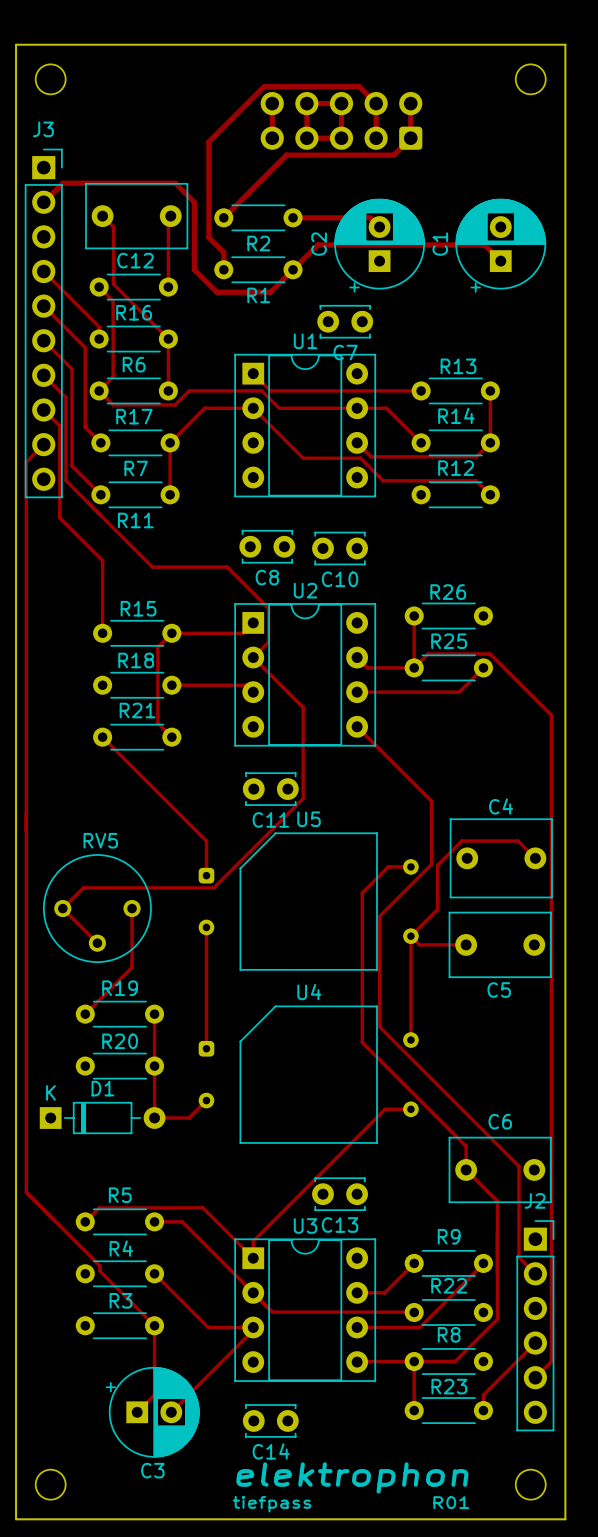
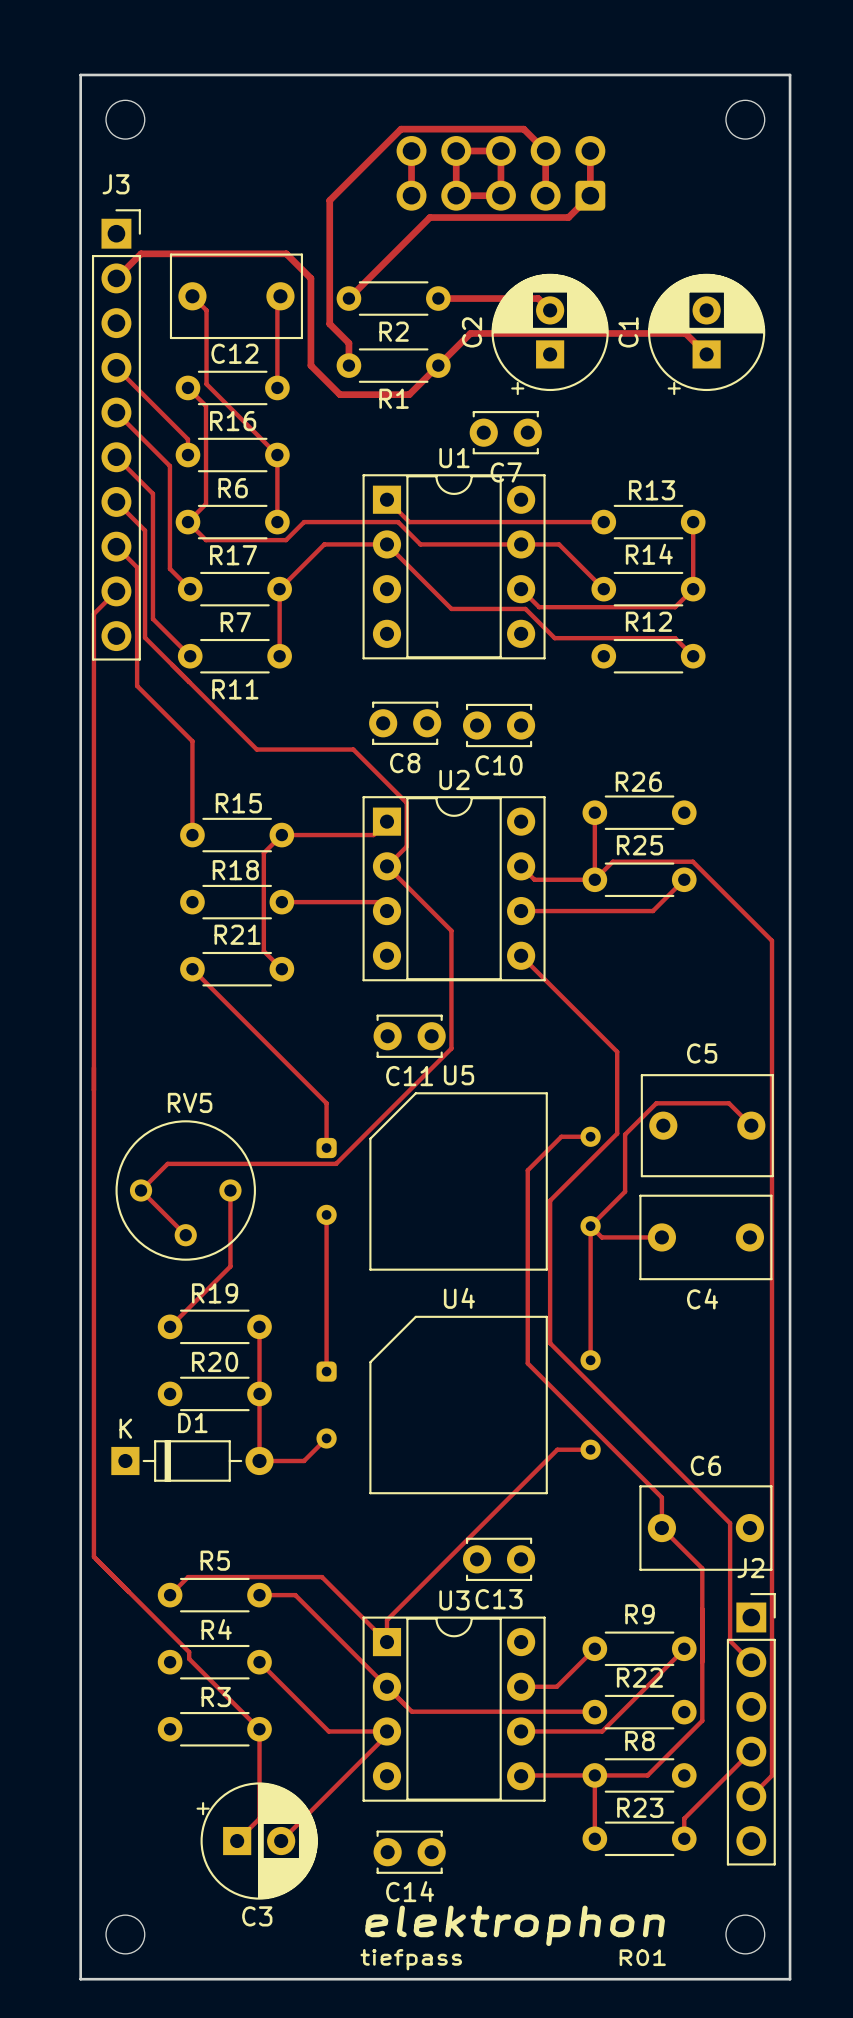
C4 name position: C4 (501, 806) -> C4 (702, 1298)
C5 name position: C5 (499, 990) -> C5 (702, 1053)

